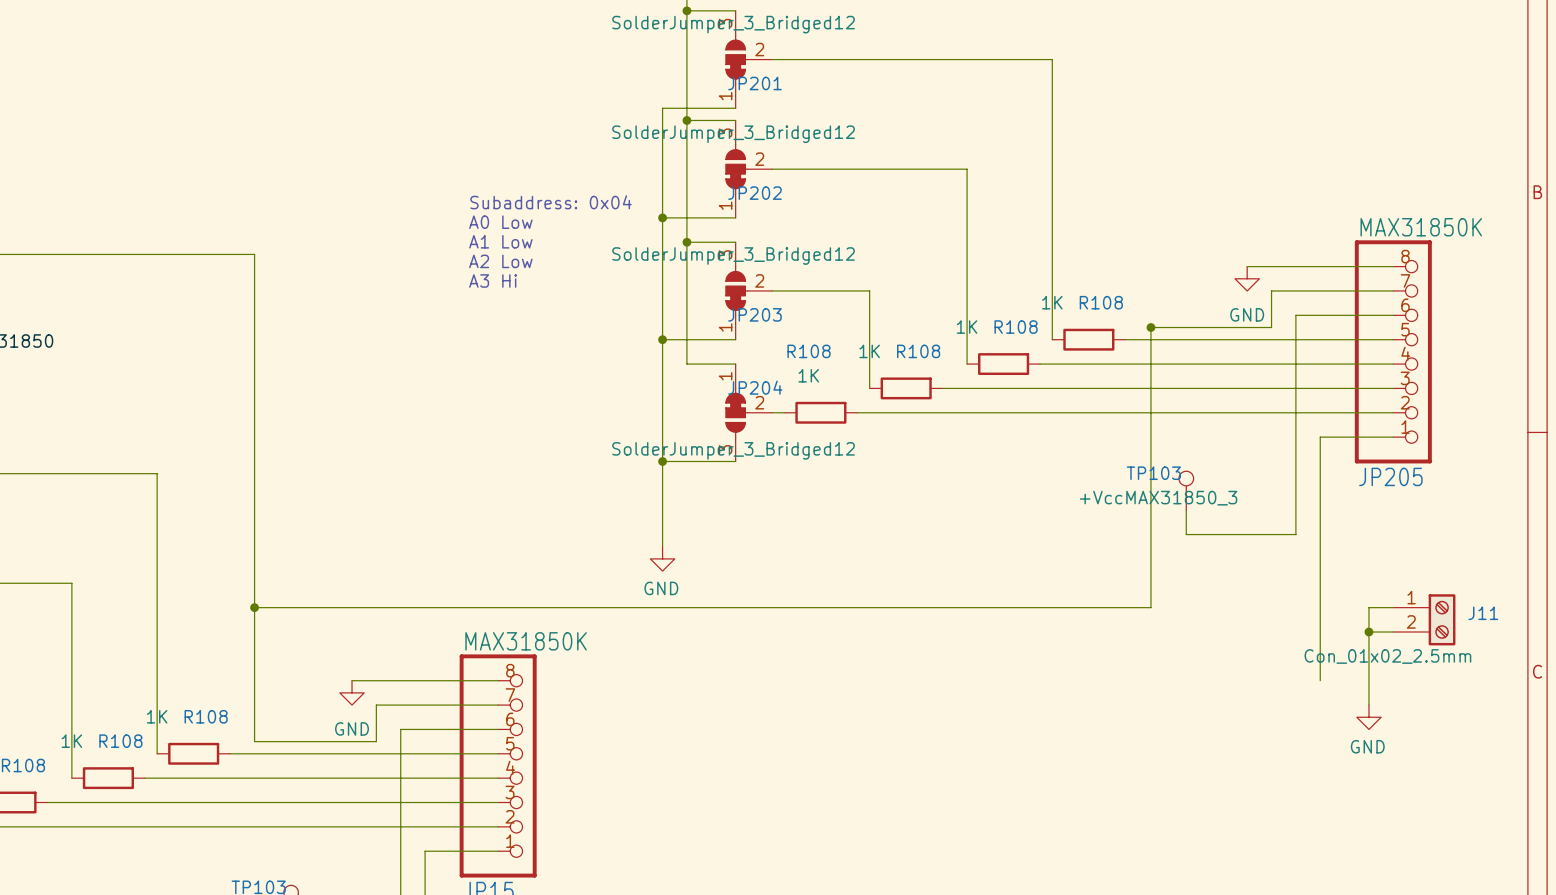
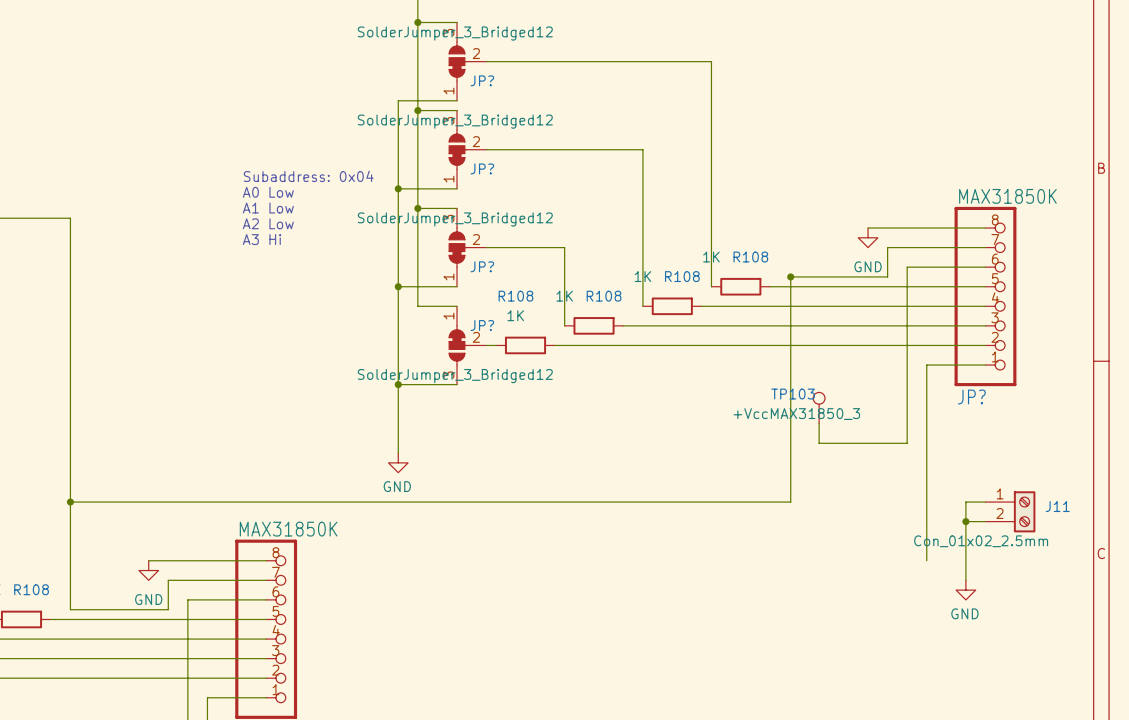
JP201 name: JP201 (754, 83) -> JP? (482, 80)
JP202 name: JP202 (754, 193) -> JP? (482, 168)
JP203 name: JP203 (754, 314) -> JP? (482, 266)
JP204 name: JP204 (755, 387) -> JP? (482, 325)
JP205 name: JP205 (1390, 476) -> JP? (971, 396)

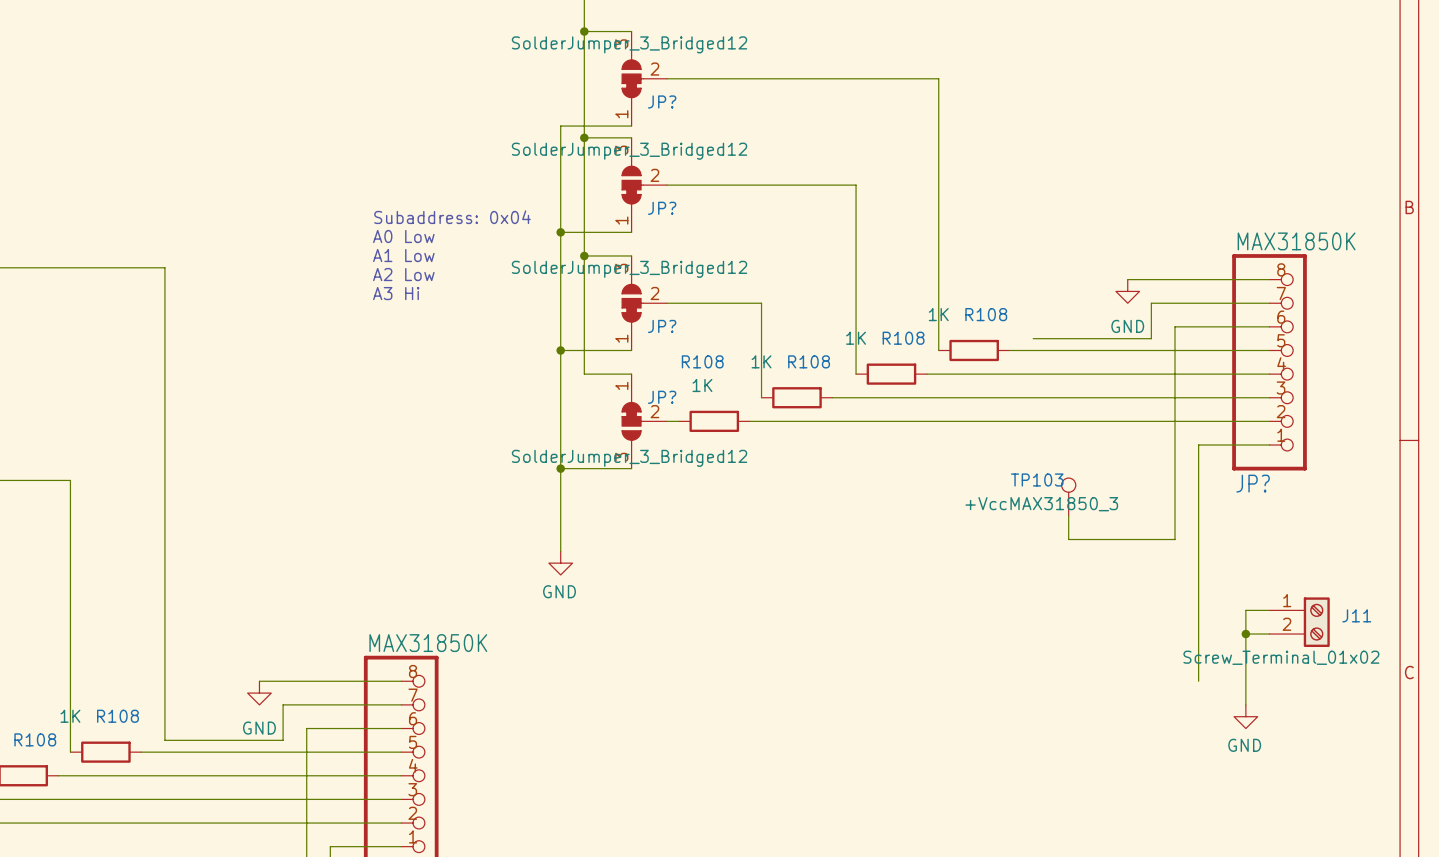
wire: (790, 276) (790, 502) (70, 502) -> none
junction: (790, 276) -> none
junction: (70, 502) -> none
J11 value: Con_01x02_2.5mm (981, 541) -> Screw_Terminal_01x02 (1281, 657)

